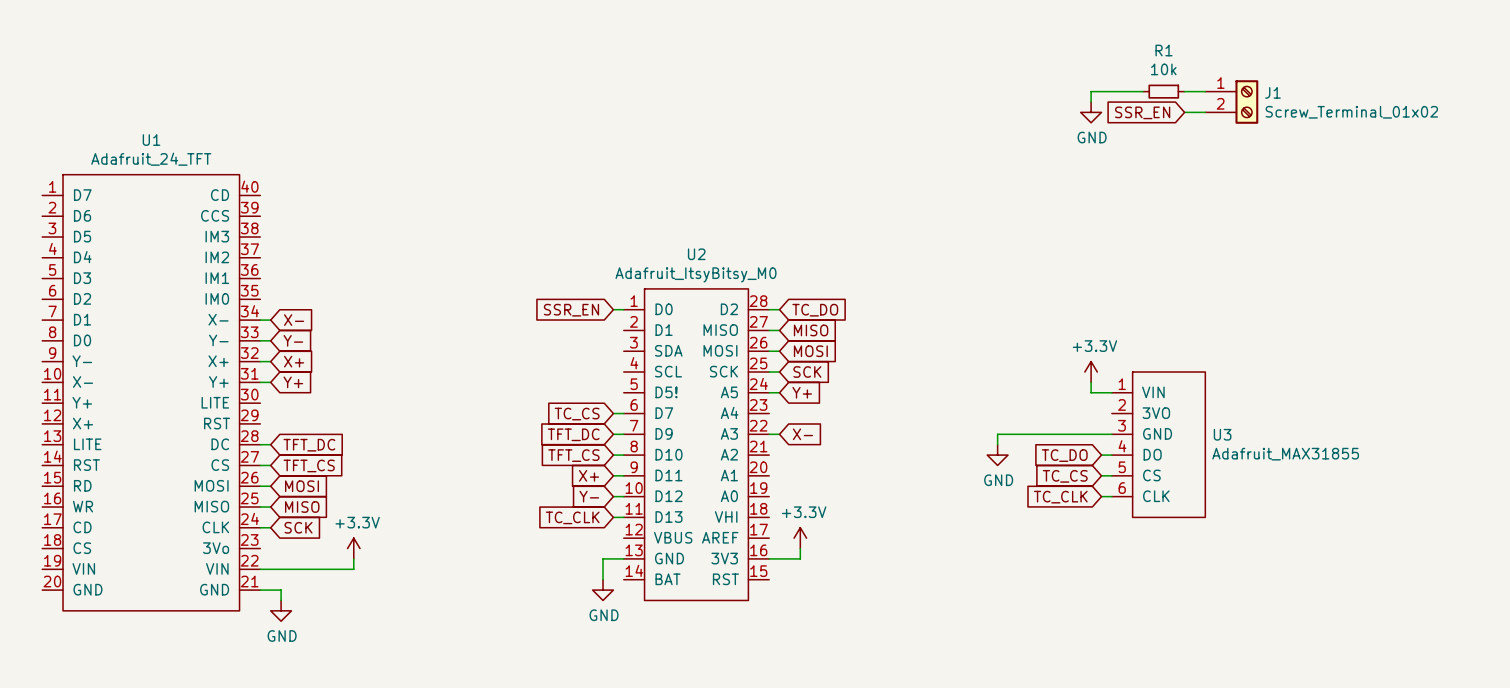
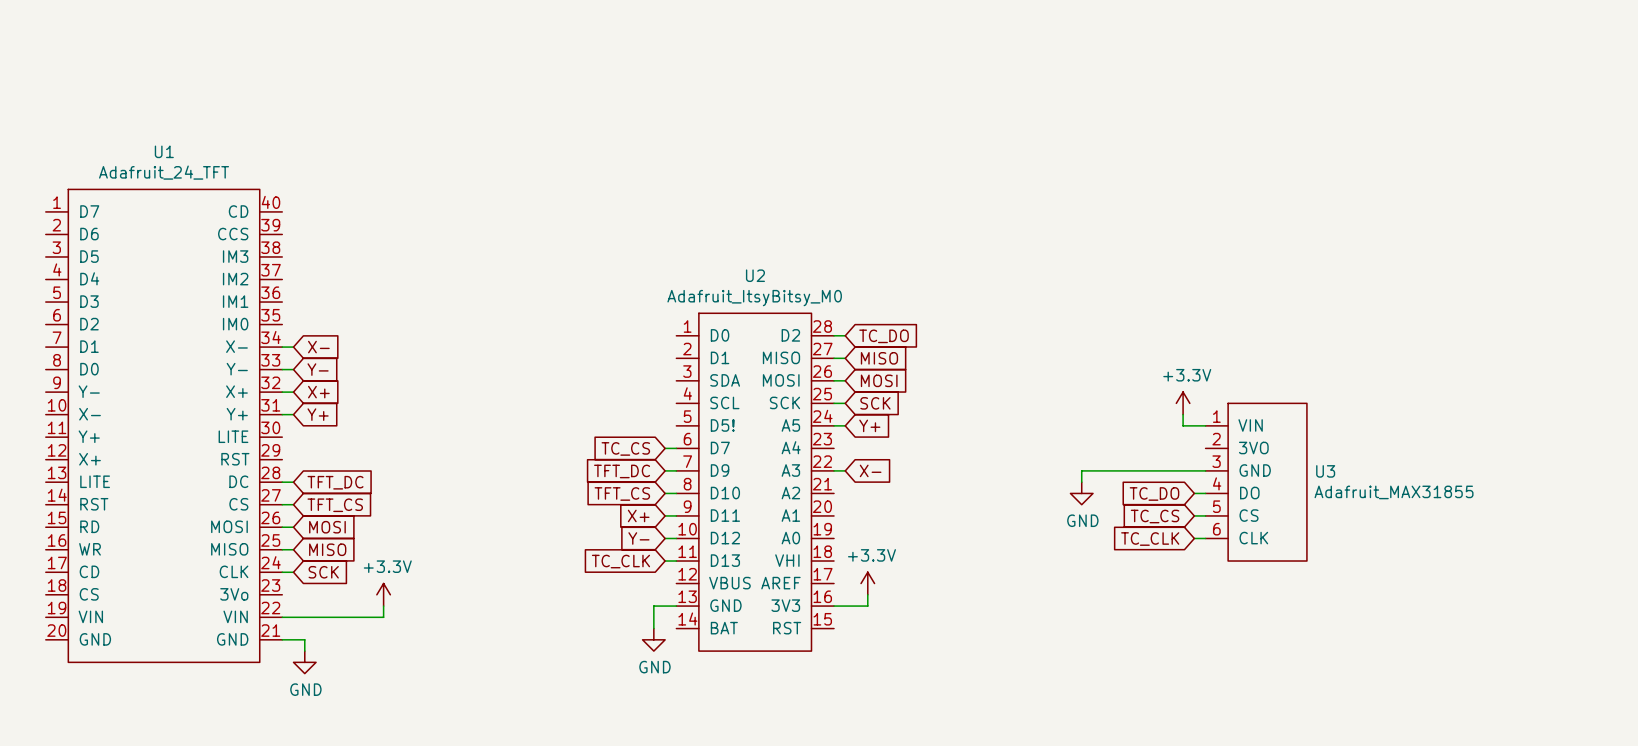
wire: (1143, 91) (1091, 91) (1091, 102) -> none
R1: 10k (1163, 91) -> none
wire: (1184, 91) (1205, 91) -> none
J1: Screw_Terminal_01x02 (1231, 102) -> none
power symbol: GND (1091, 112) -> none
global label: SSR_EN (1142, 112) -> none
wire: (1184, 112) (1205, 112) -> none
wire: (613, 309) (623, 309) -> none
global label: SSR_EN (571, 310) -> none

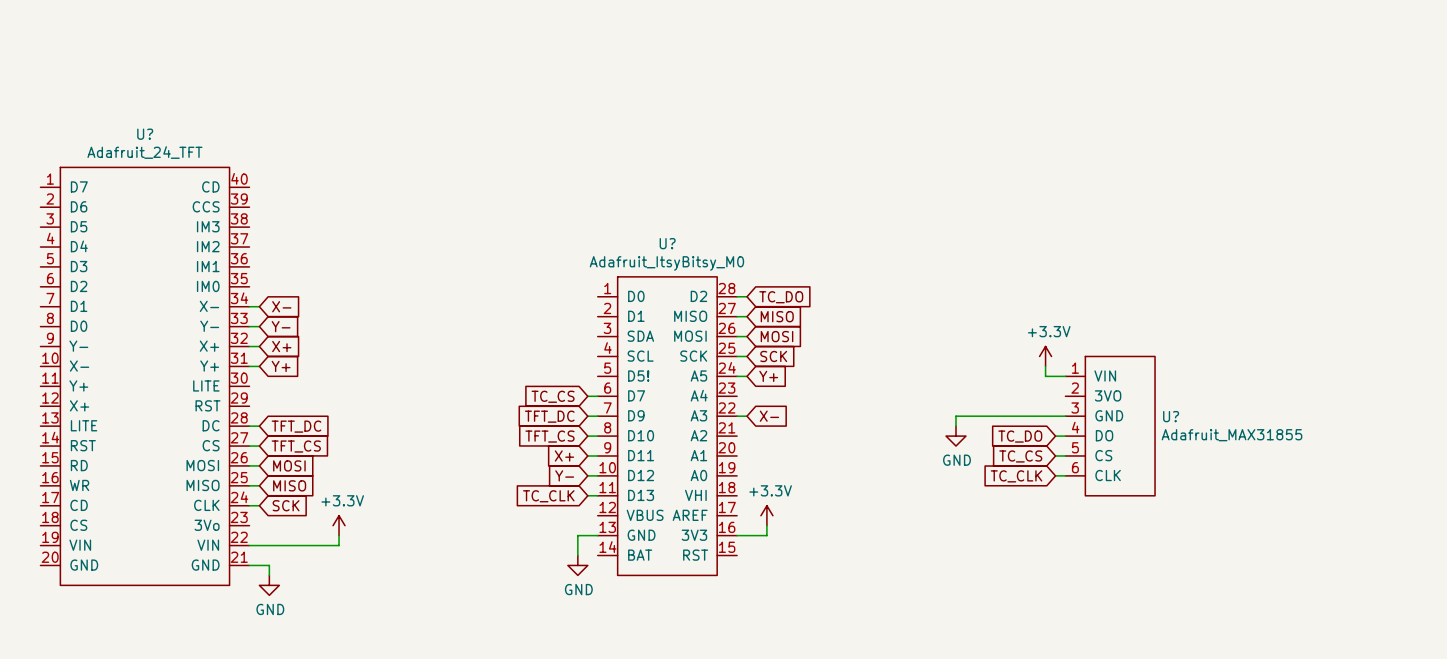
U1 name: U1 (164, 151) -> U? (145, 134)
U2 name: U2 (755, 275) -> U? (667, 243)
U3 name: U3 (1325, 471) -> U? (1171, 416)

